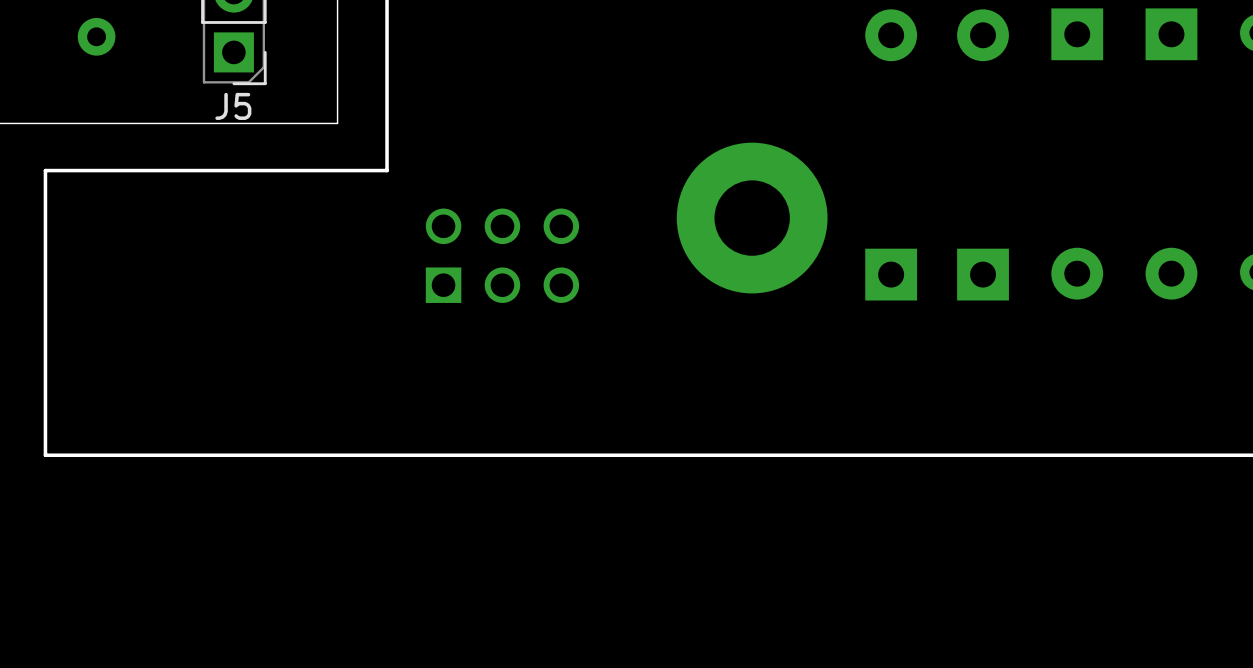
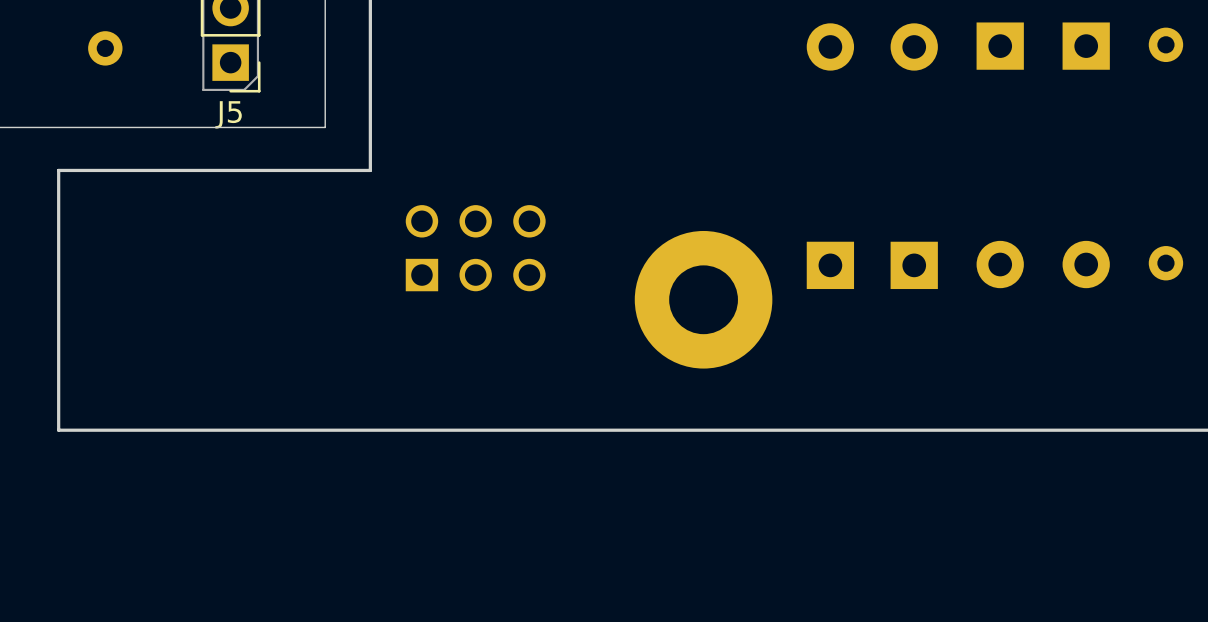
part position: (752, 218) -> (703, 299)

